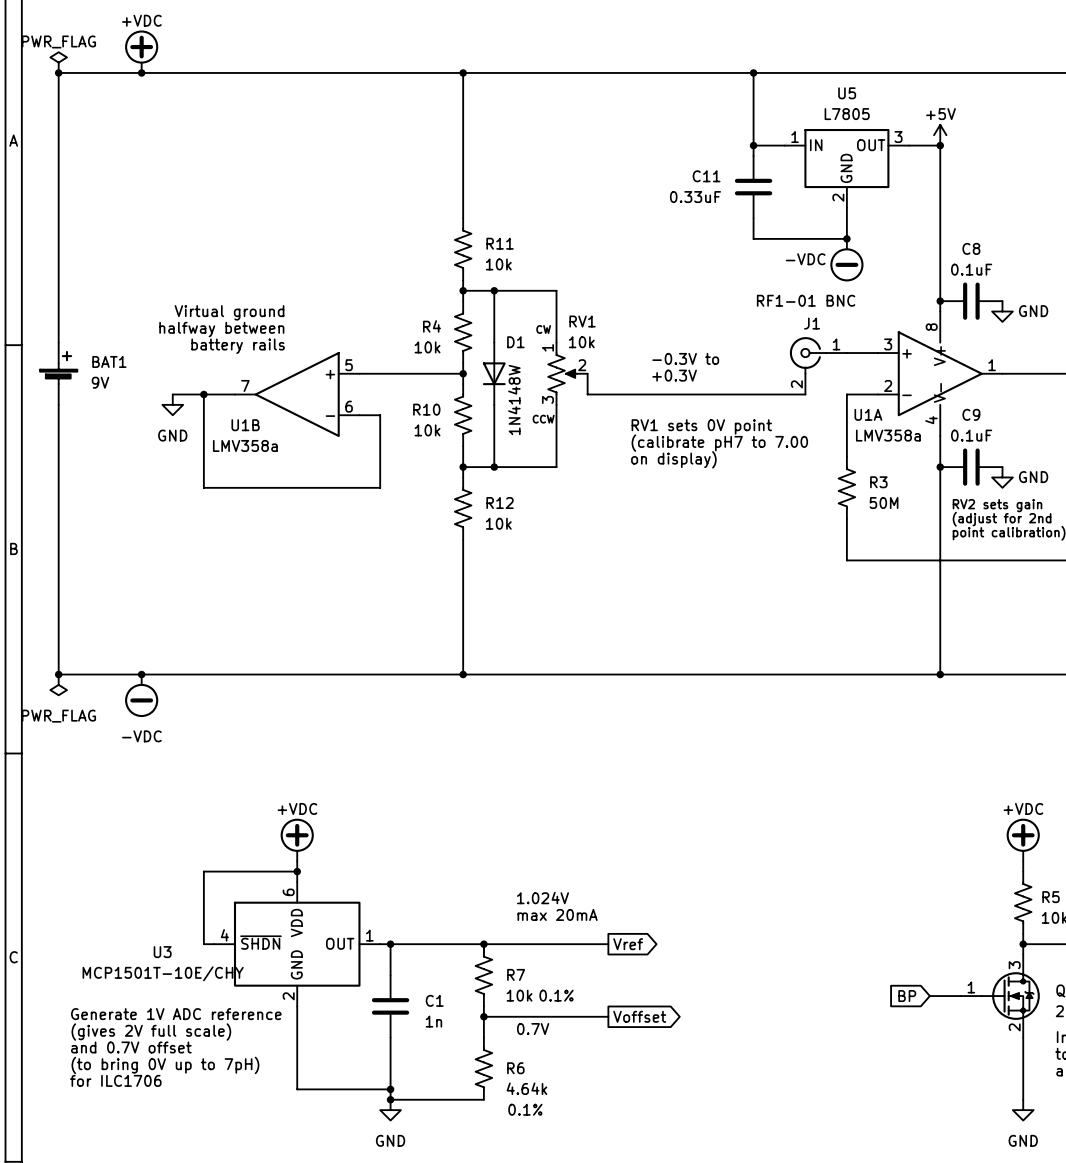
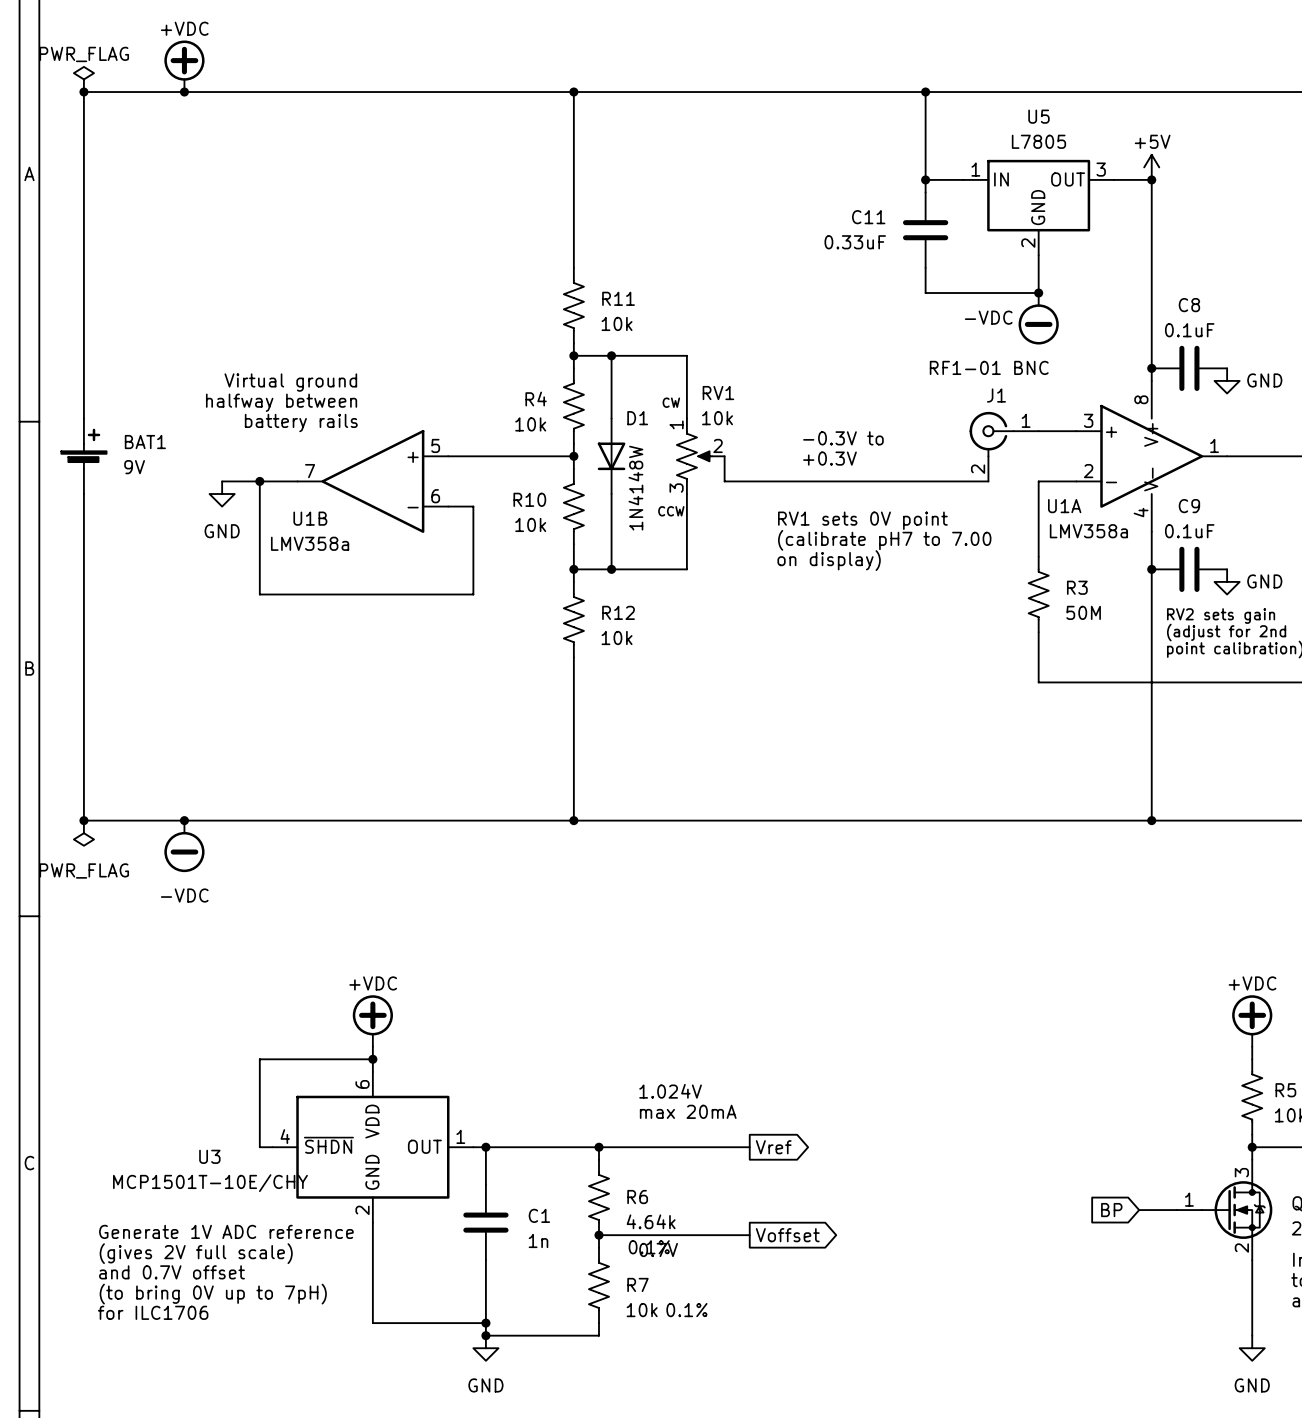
R7 position: (483, 975) -> (599, 1285)
R6 position: (483, 1068) -> (599, 1197)

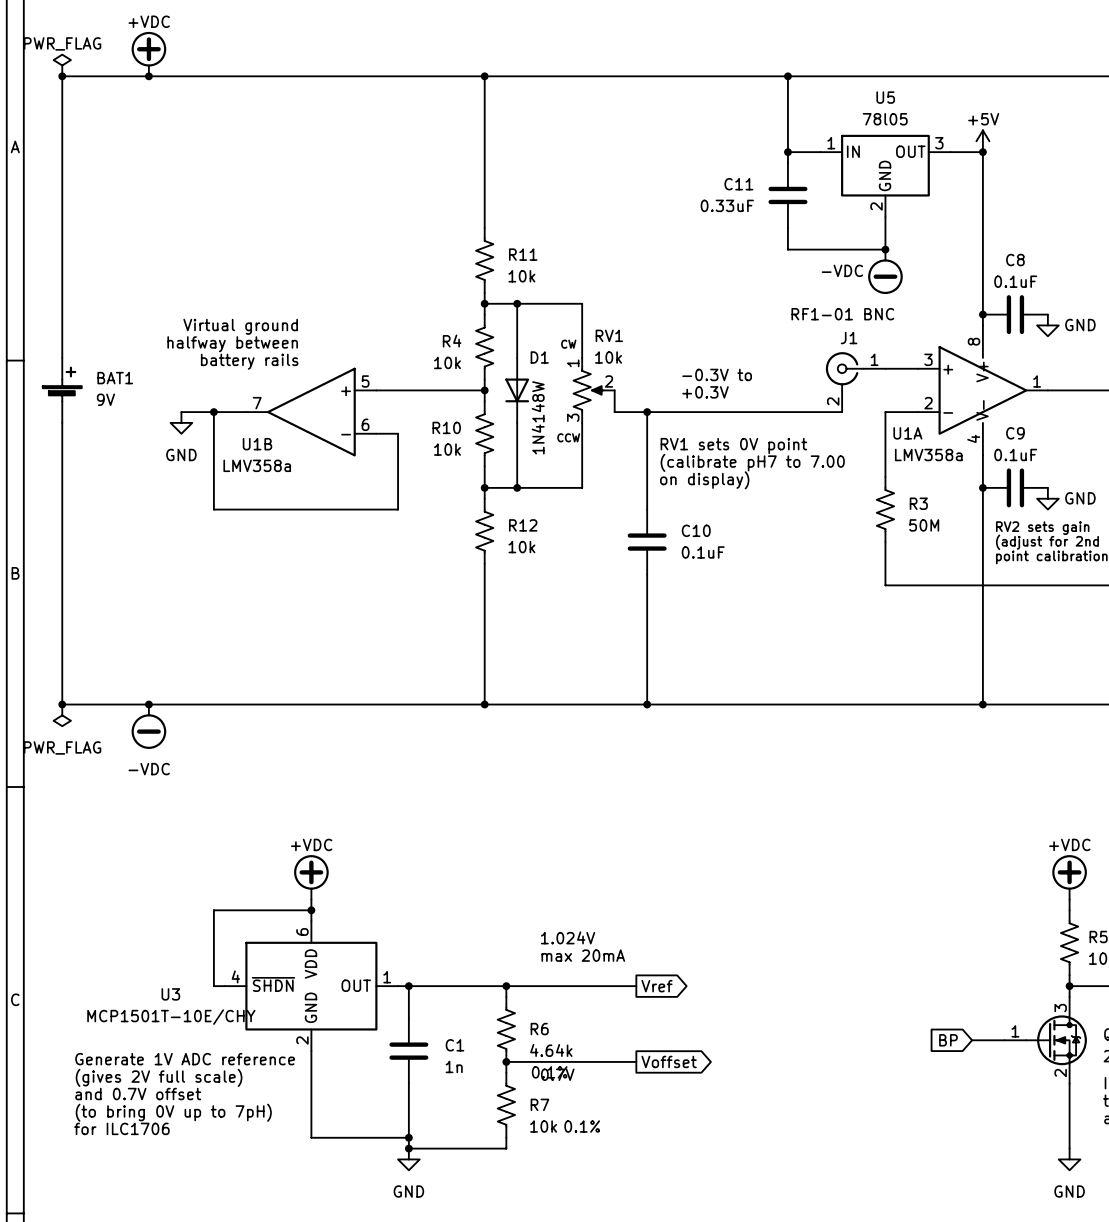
U5 value: L7805 (1038, 141) -> 78l05 (885, 119)
wire: none -> (647, 412) (647, 509)
junction: none -> (647, 412)
C10: none -> 0.1uF (647, 542)
wire: none -> (647, 574) (647, 704)
junction: none -> (647, 704)

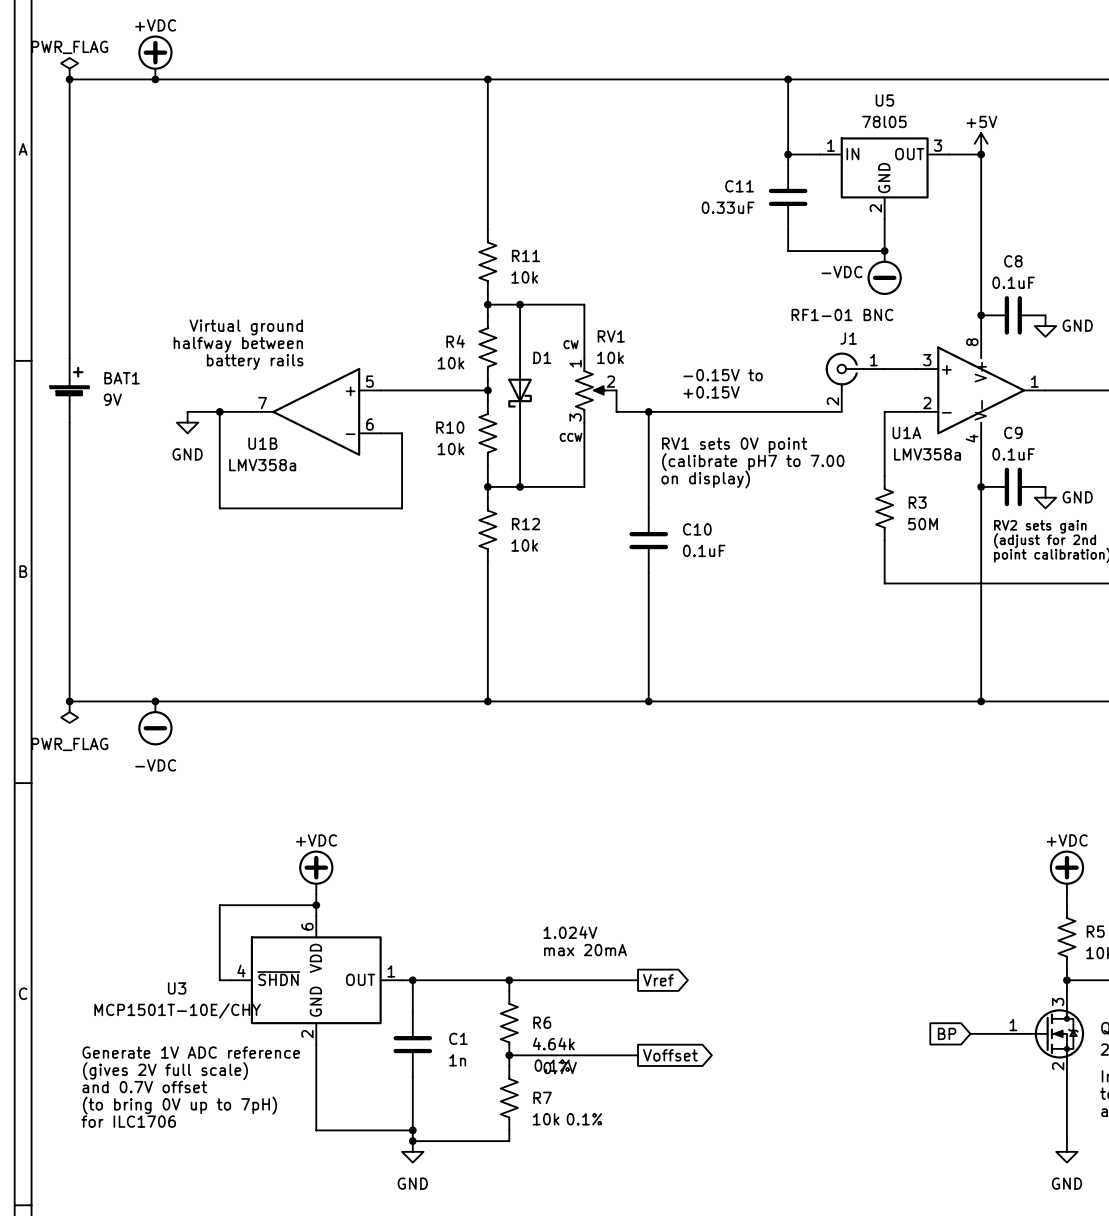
D1 symbol: [505, 357, 530, 423] -> [508, 358, 532, 423]
text: -0.3V to (717, 374) -> -0.15V to (723, 375)
text: +0.3V (705, 392) -> +0.15V (711, 392)
D1 value: 1N4148W (538, 417) -> none

